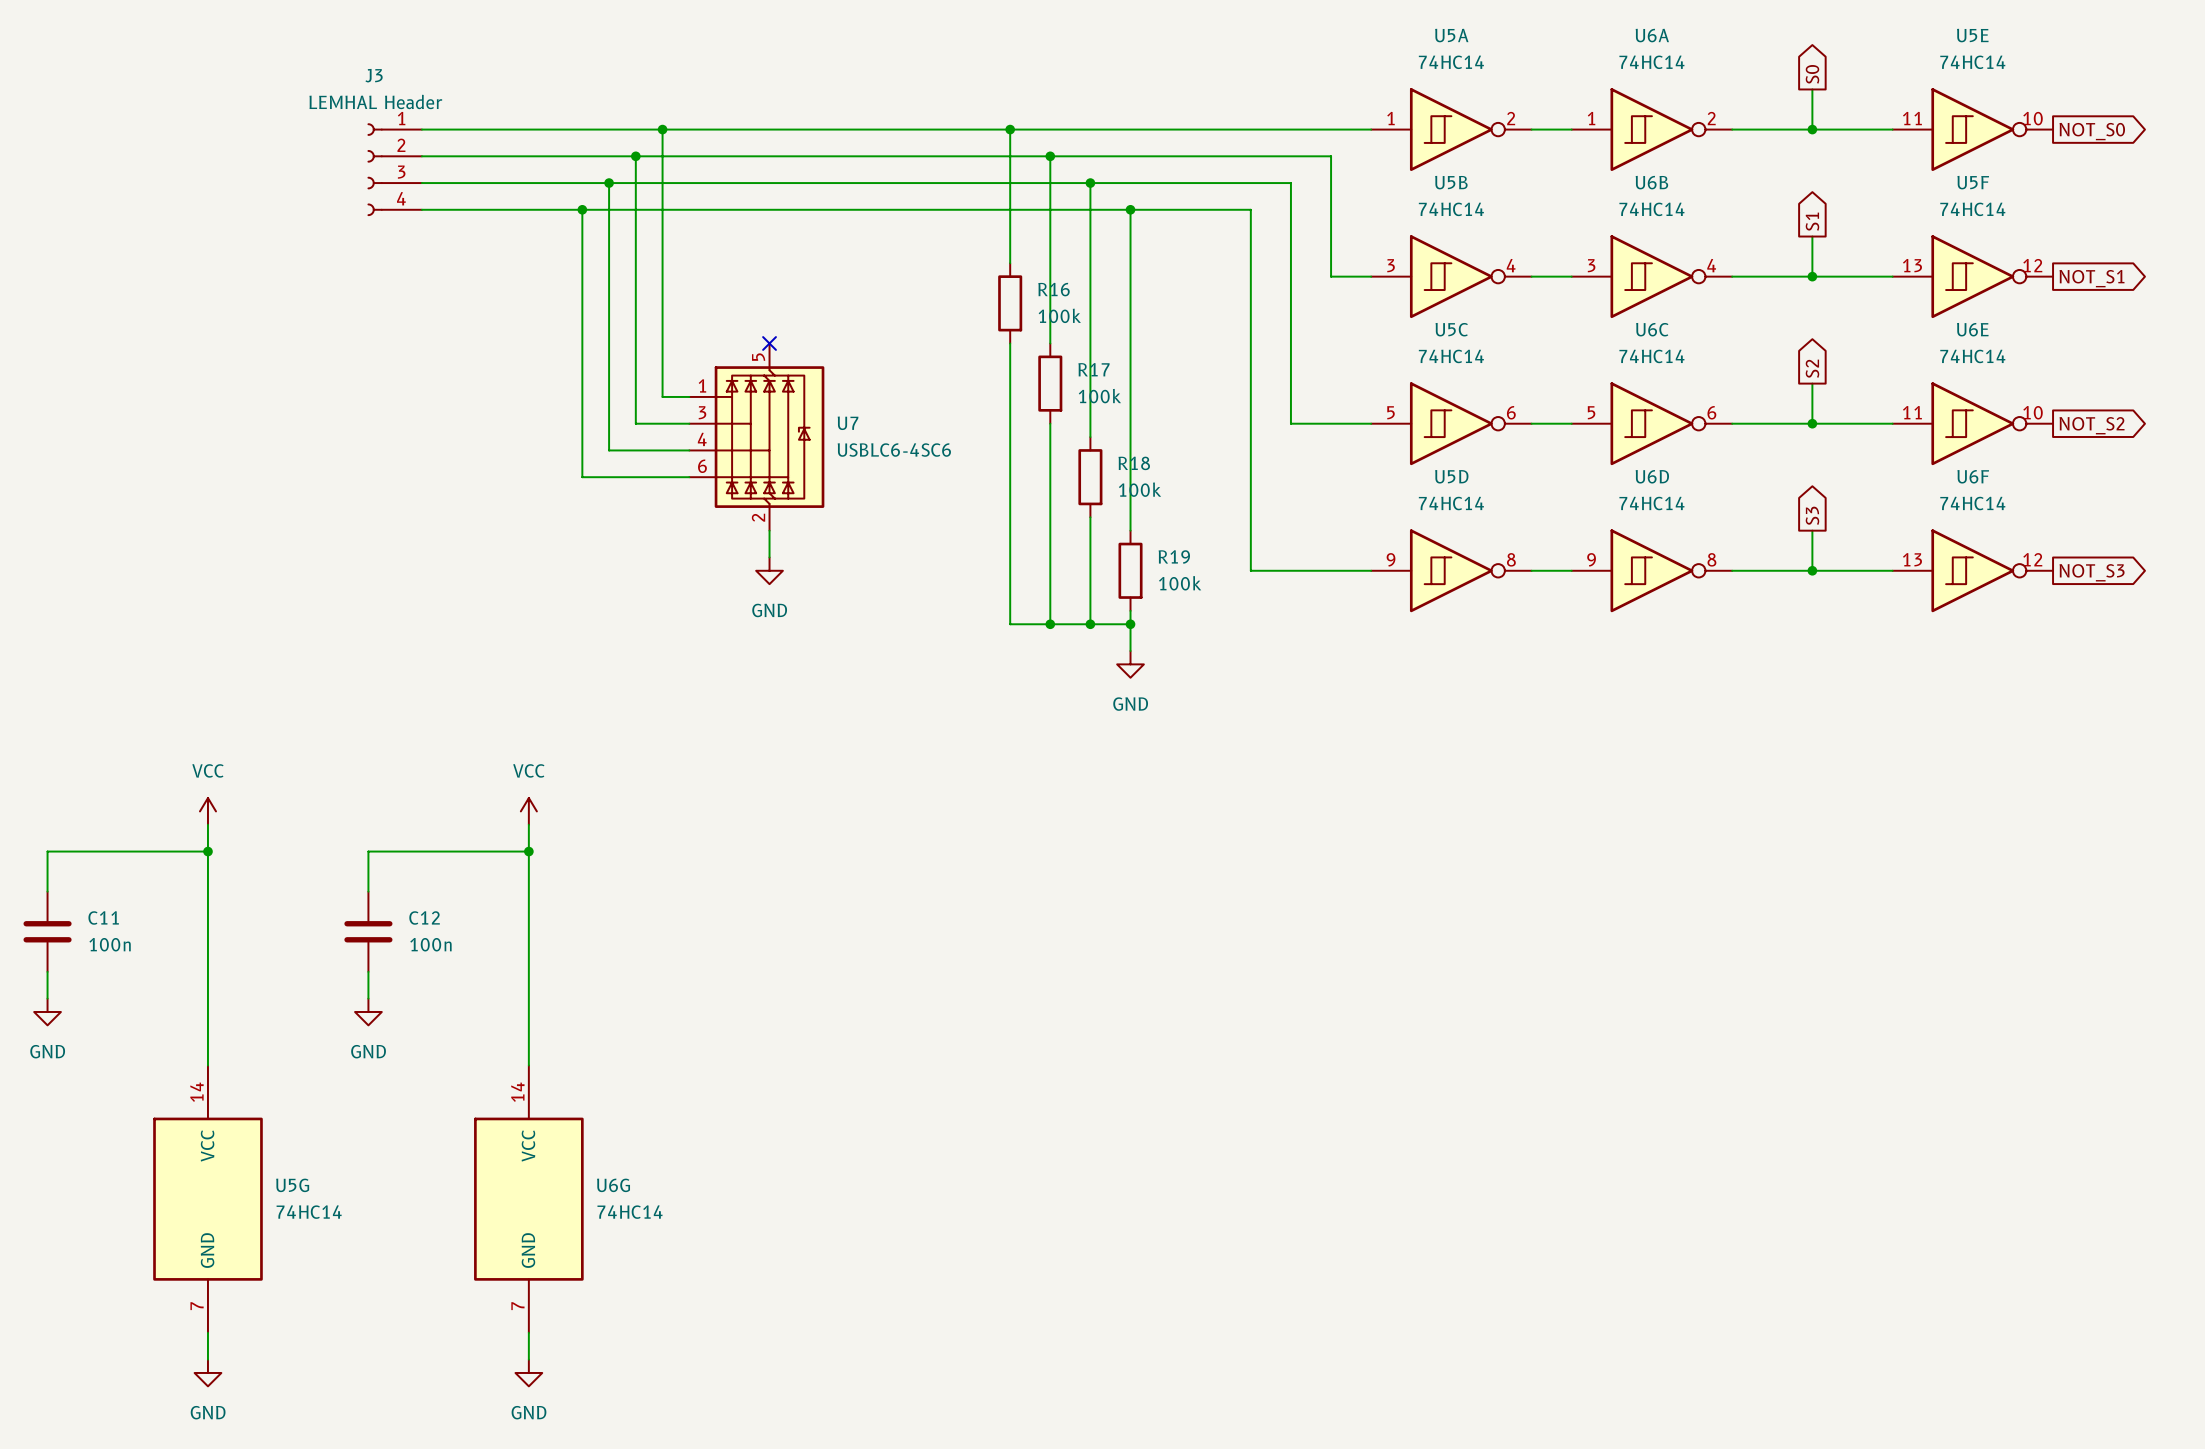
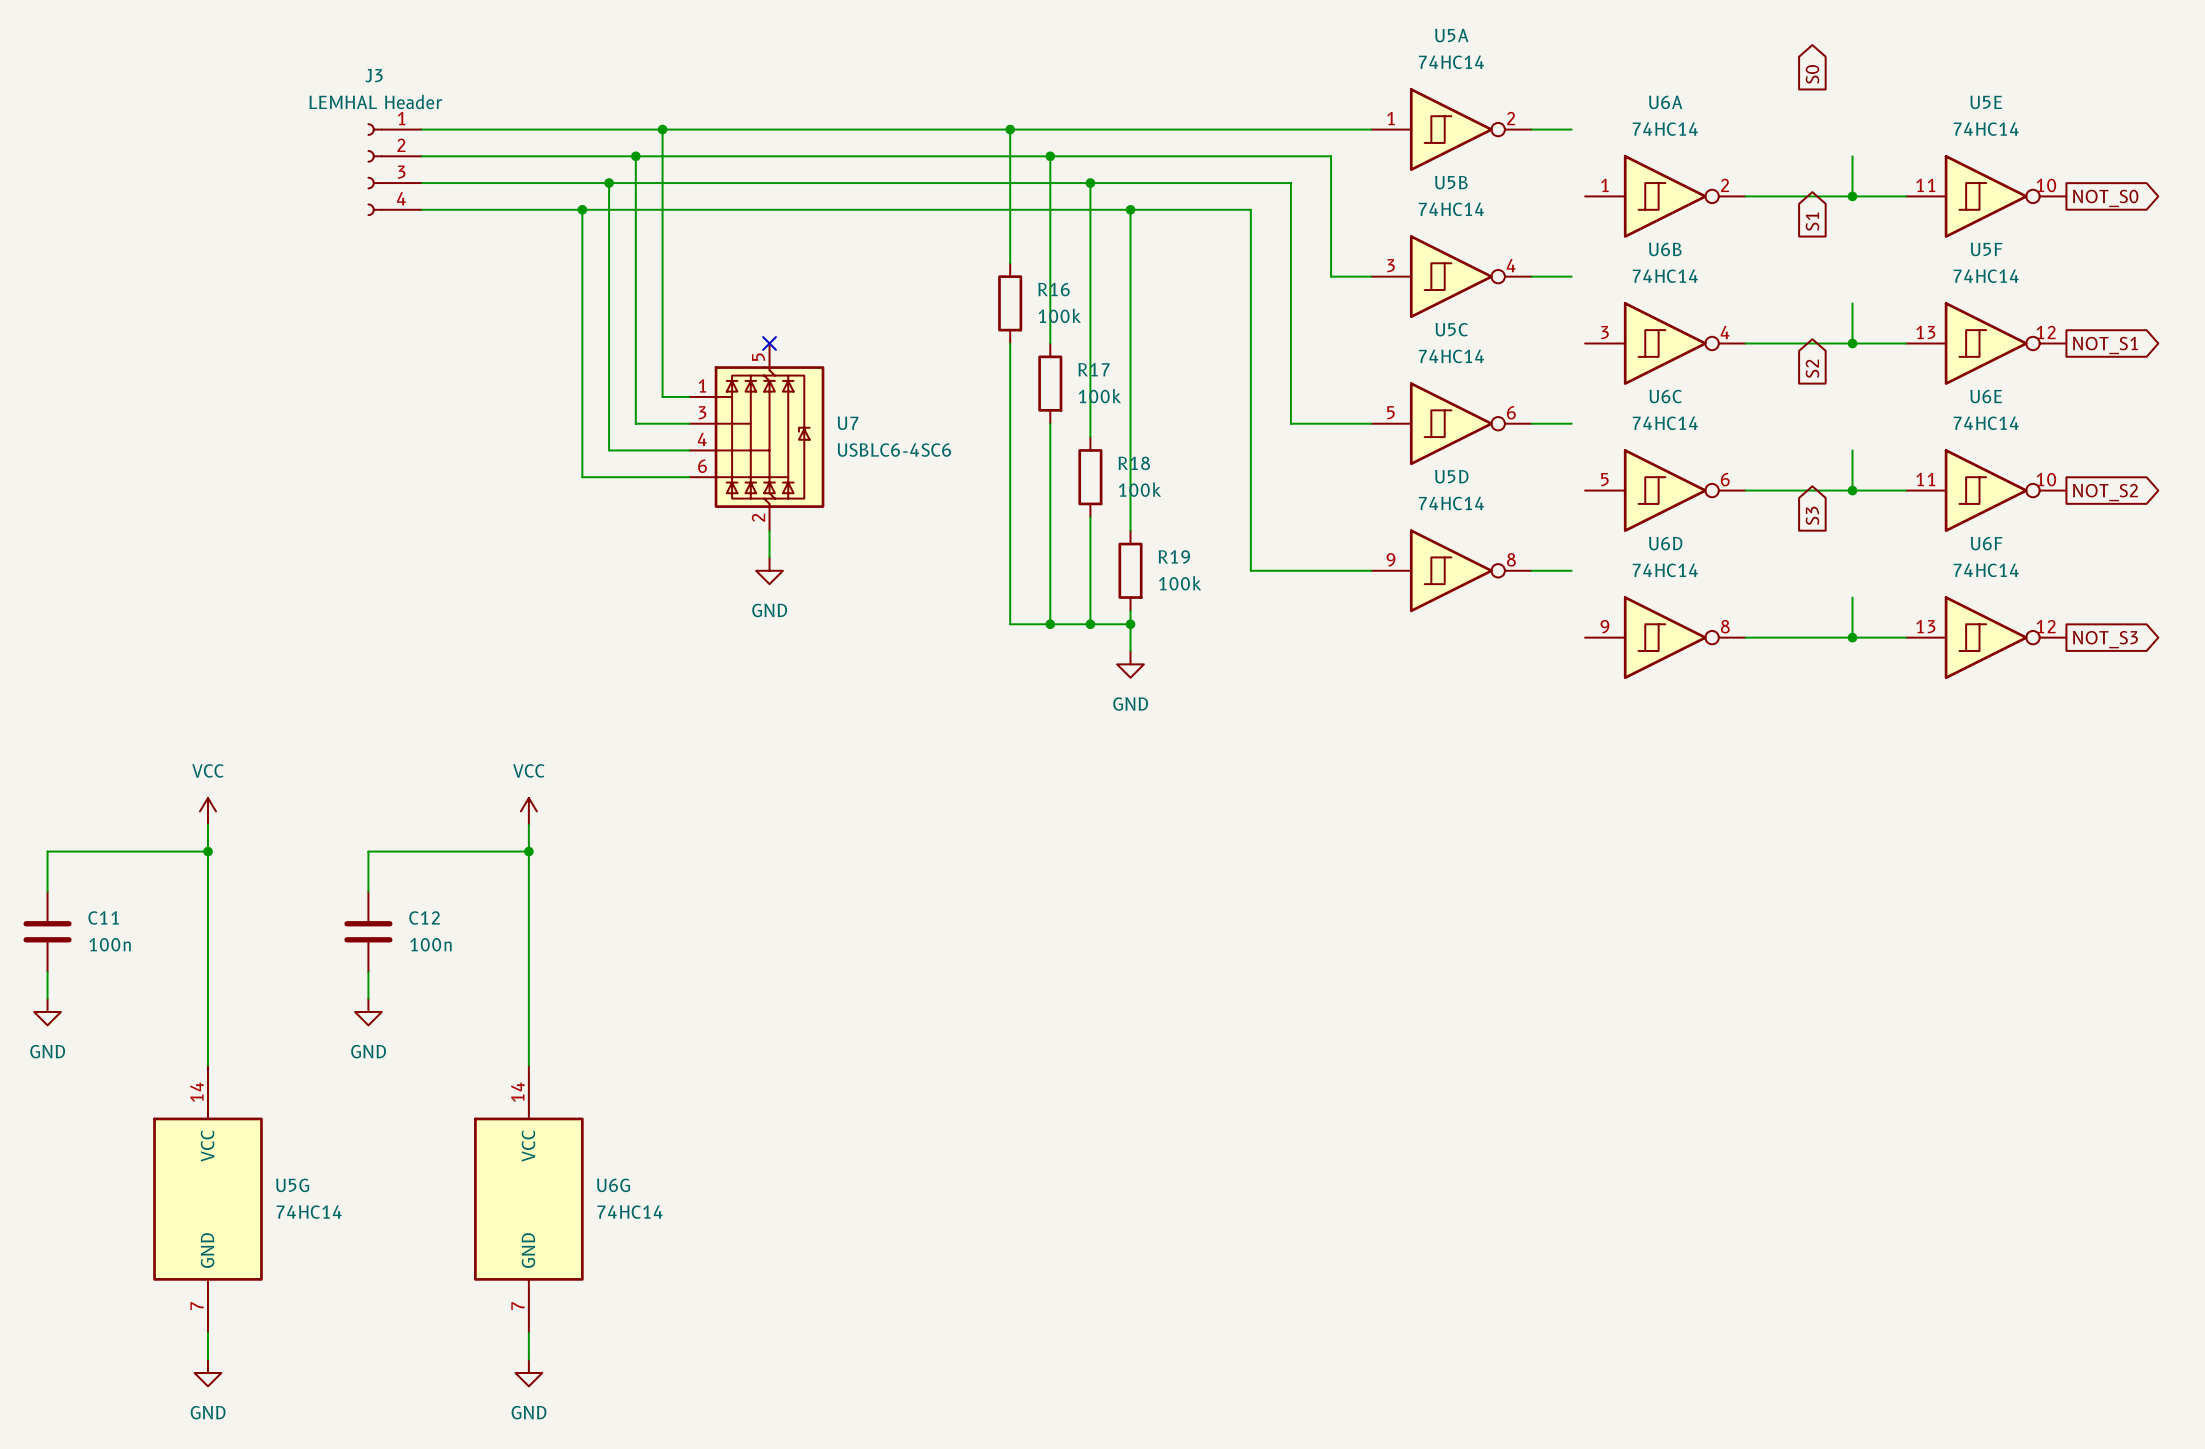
wire: (1812, 89) (1812, 129) -> (1852, 156) (1852, 196)
U6A position: (1651, 129) -> (1665, 196)
wire: (1732, 129) (1892, 129) -> (1745, 196) (1905, 196)
junction: (1812, 129) -> none
U5E position: (1972, 129) -> (1986, 196)
global label position: NOT_S0 (2092, 131) -> NOT_S0 (2105, 198)
junction: none -> (1852, 196)
wire: (1812, 236) (1812, 276) -> (1852, 303) (1852, 343)
U6B position: (1651, 276) -> (1665, 343)
wire: (1732, 276) (1892, 276) -> (1745, 343) (1905, 343)
junction: (1812, 276) -> none
U5F position: (1972, 276) -> (1986, 343)
global label position: NOT_S1 (2092, 278) -> NOT_S1 (2105, 345)
junction: none -> (1852, 343)
wire: (1812, 383) (1812, 423) -> (1852, 450) (1852, 490)
U6C position: (1651, 423) -> (1665, 490)
wire: (1732, 423) (1892, 423) -> (1745, 490) (1905, 490)
junction: (1812, 423) -> none
U6E position: (1972, 423) -> (1986, 490)
global label position: NOT_S2 (2092, 425) -> NOT_S2 (2105, 492)
junction: none -> (1852, 490)
wire: (1812, 530) (1812, 570) -> (1852, 597) (1852, 637)
U6D position: (1651, 570) -> (1665, 637)
wire: (1732, 570) (1892, 570) -> (1745, 637) (1905, 637)
junction: (1812, 570) -> none
U6F position: (1972, 570) -> (1986, 637)
global label position: NOT_S3 (2092, 572) -> NOT_S3 (2105, 639)
junction: none -> (1852, 637)

